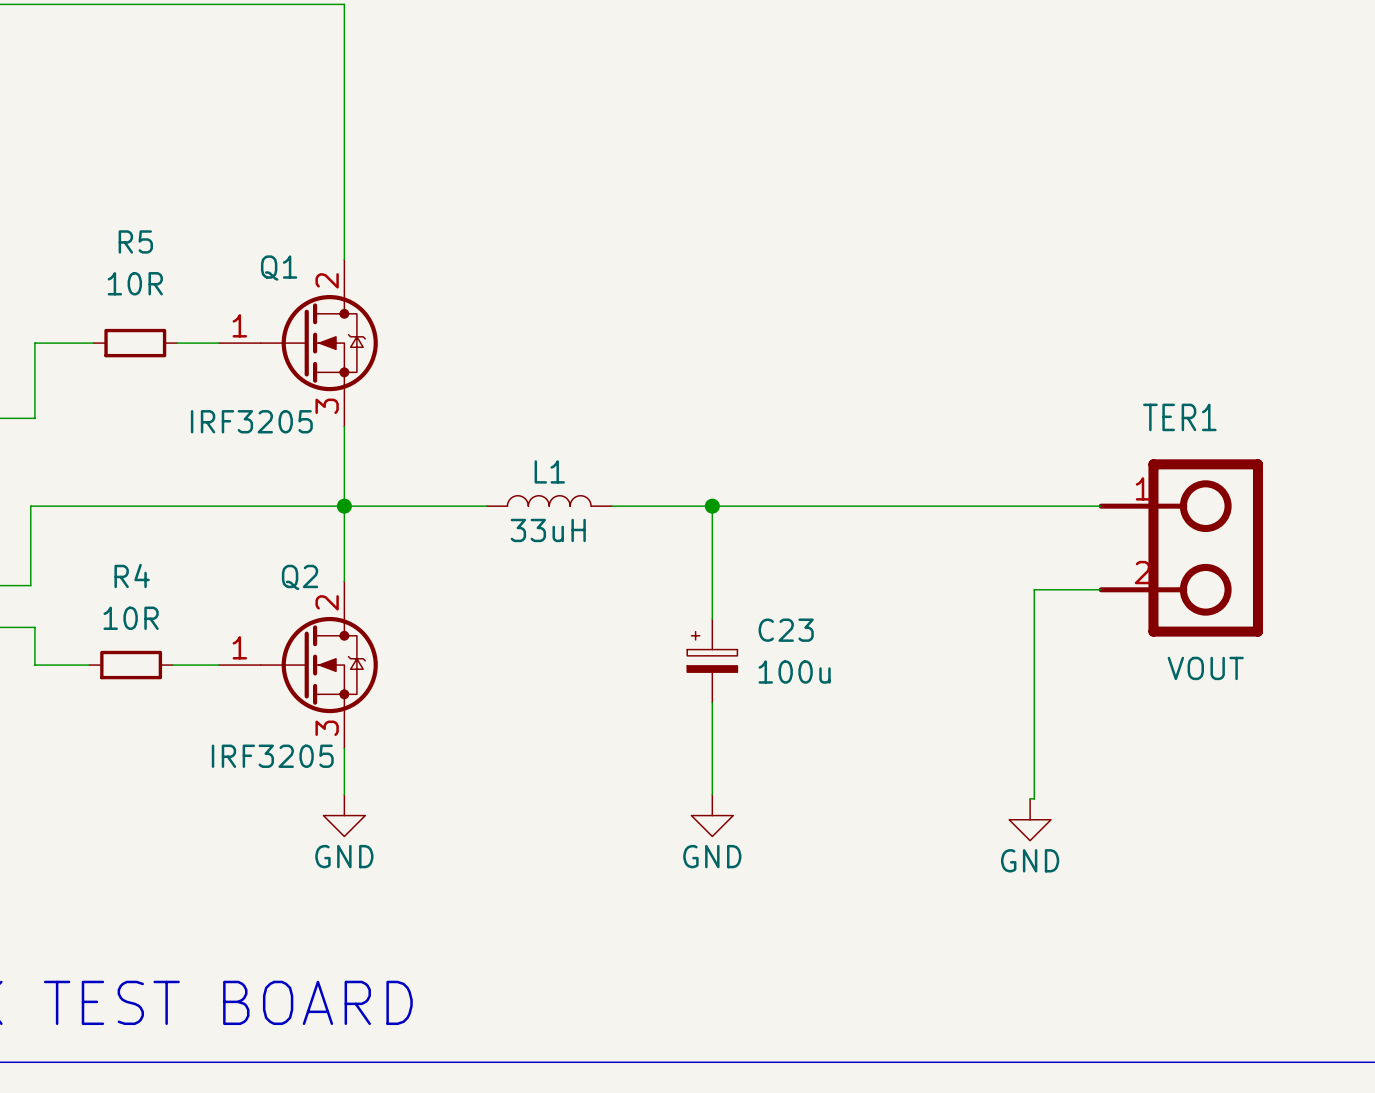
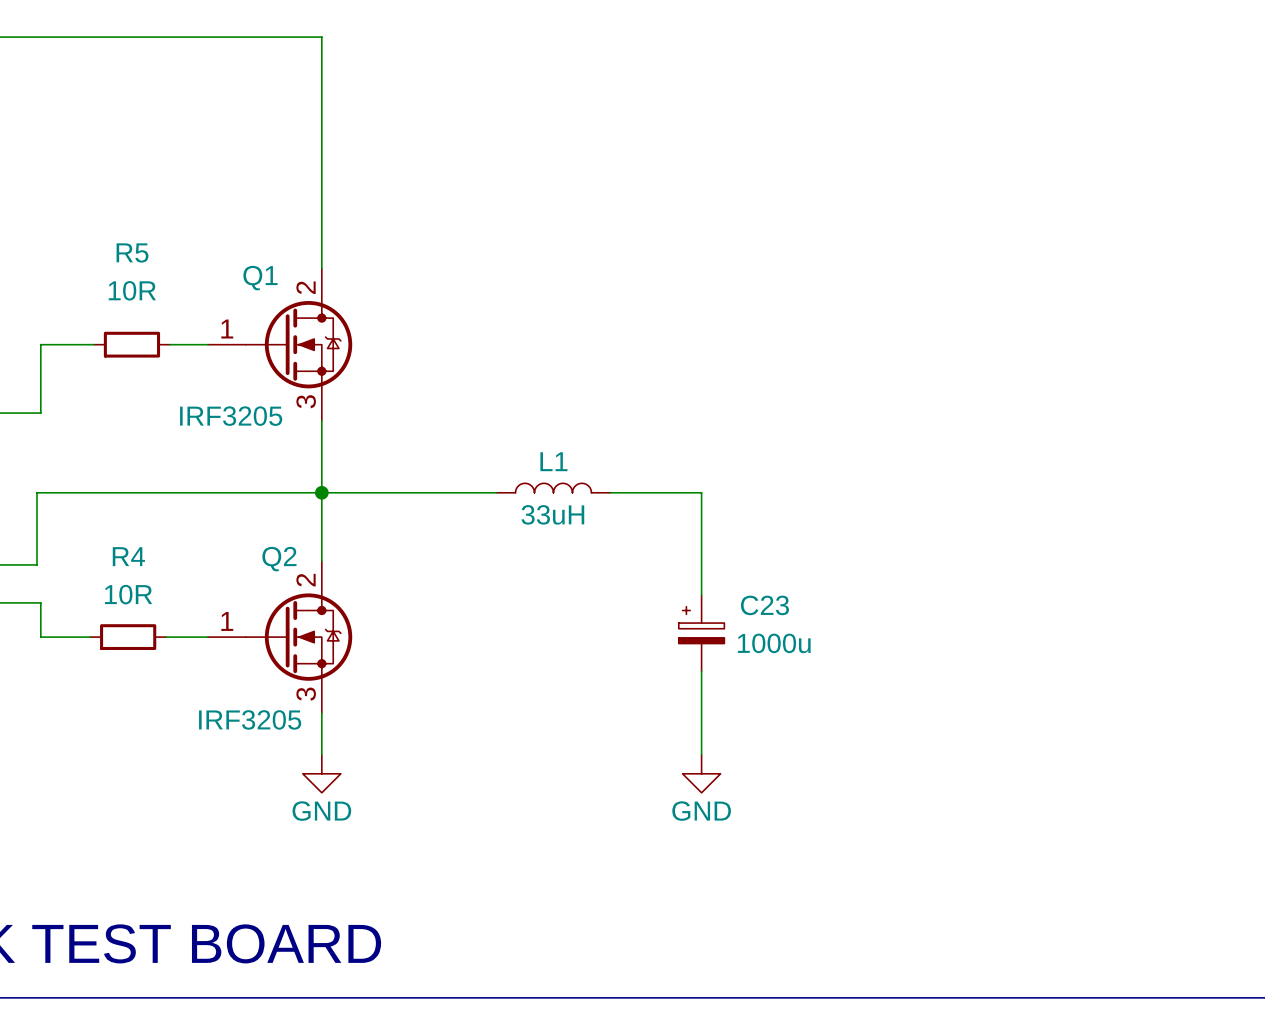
L1 position: (549, 500) -> (553, 488)
wire: (611, 506) (662, 506) -> (450, 492) (496, 492)
wire: (712, 506) (712, 619) -> none
junction: (712, 506) -> none
wire: (762, 506) (1101, 506) -> (701, 492) (701, 595)
TER1: VOUT (1180, 547) -> none
wire: (1101, 589) (1034, 589) (1034, 798) (1030, 798) -> none
C23 position: (712, 660) -> (701, 633)
C23 value: 100u (794, 672) -> 1000u (774, 643)
wire: (712, 702) (712, 794) -> (701, 671) (701, 754)
power symbol position: GND (712, 815) -> GND (701, 773)
power symbol: GND (1030, 819) -> none

